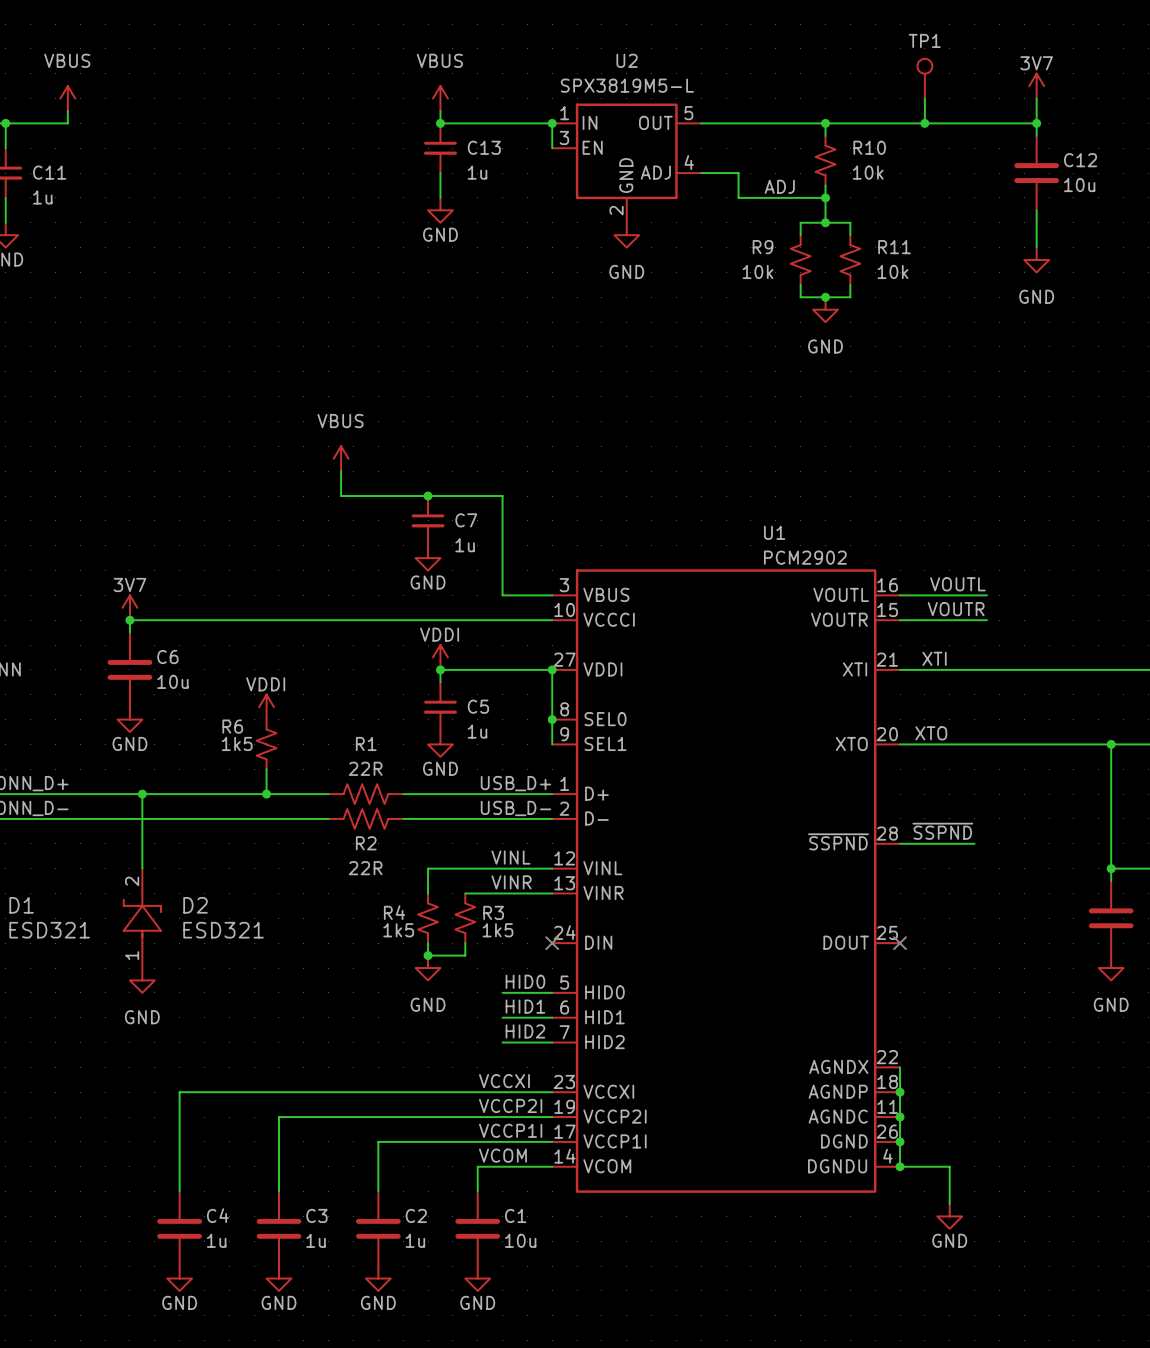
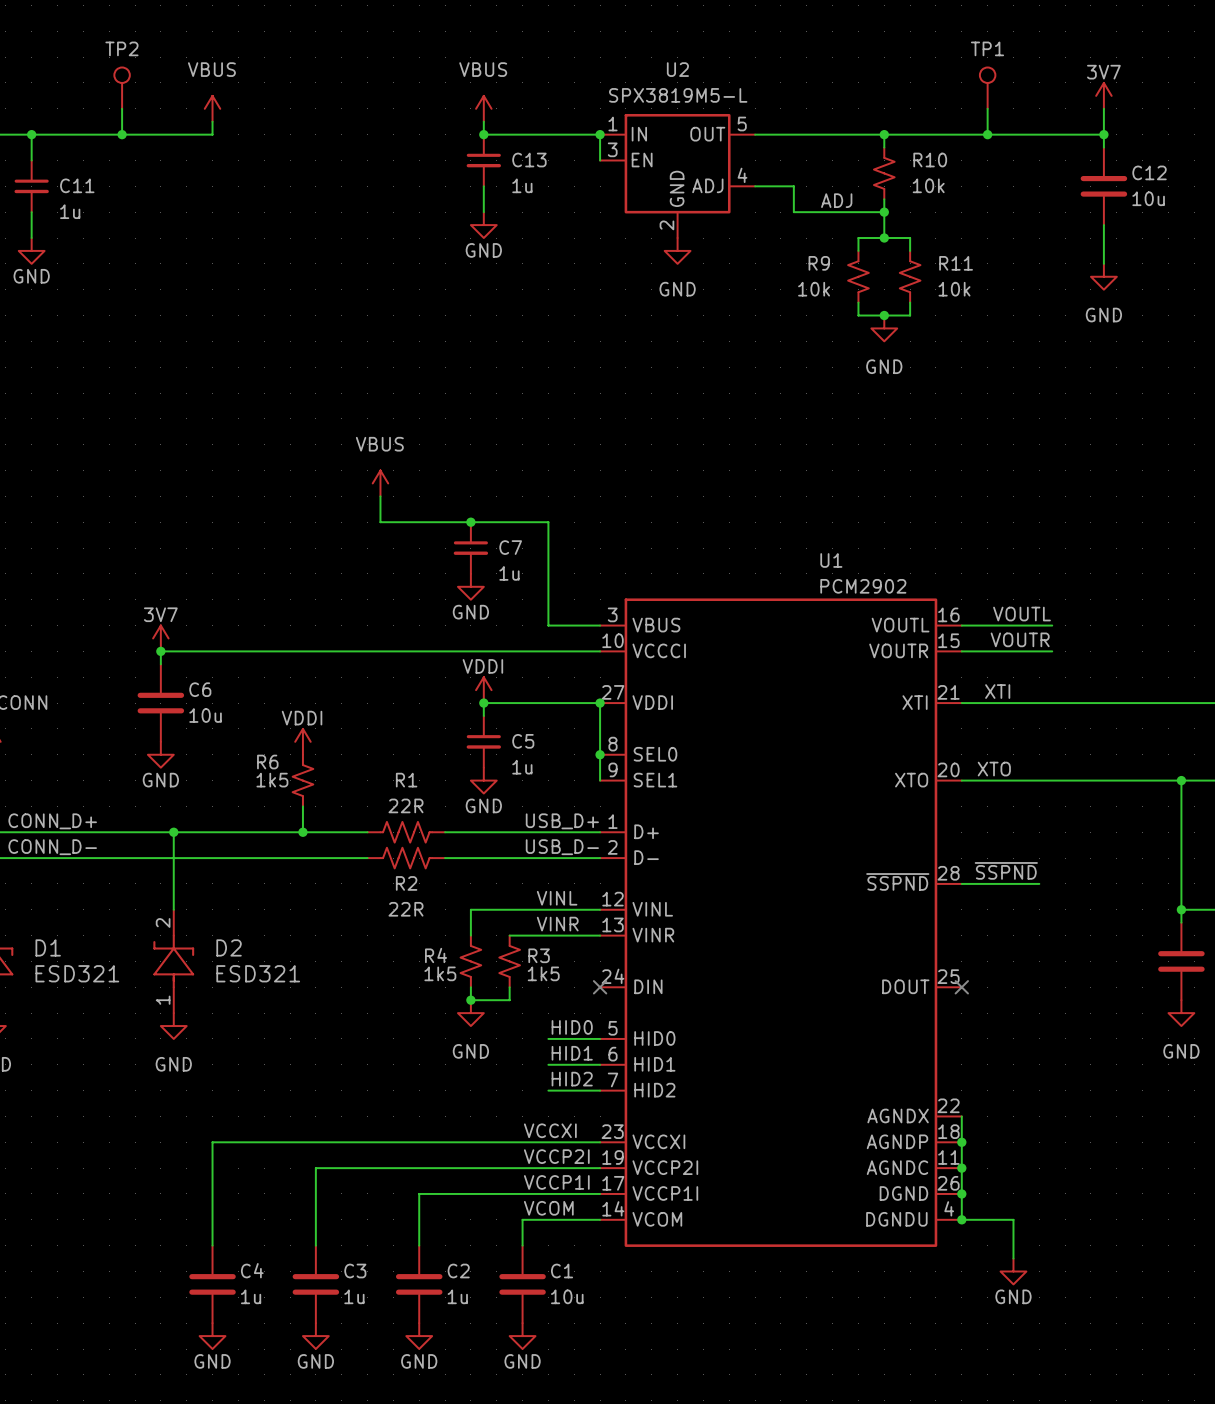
TP2: none -> (122, 88)
power symbol position: VBUS (67, 98) -> VBUS (212, 108)
wire: none -> (122, 108) (122, 134)
wire: (67, 110) (67, 123) -> (212, 121) (212, 134) (96, 134)
junction: none -> (122, 134)

